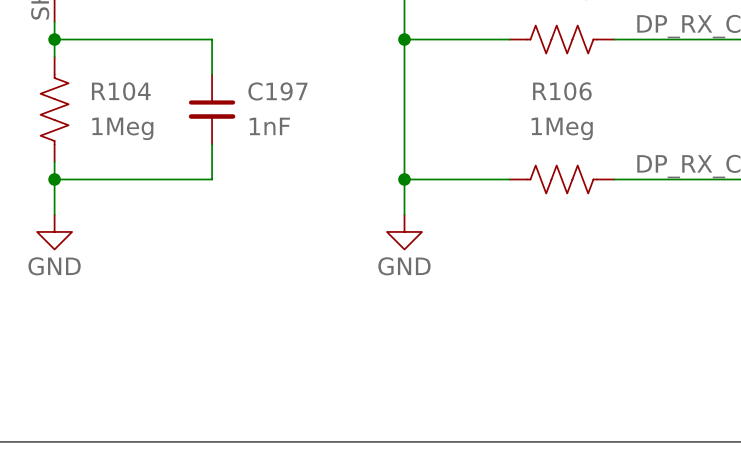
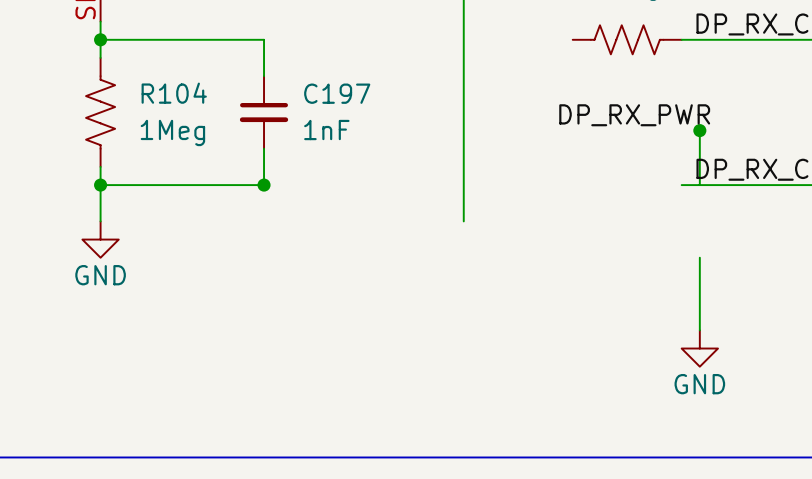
wire: (404, 39) (509, 39) -> none
junction: (404, 39) -> none
label: none -> DP_RX_PWR (634, 115)
wire: none -> (699, 130) (699, 185)
junction: none -> (699, 130)
junction: none -> (264, 185)
wire: (404, 179) (509, 179) -> none
junction: (404, 179) -> none
R106: 1Meg (561, 179) -> none
power symbol: GND (404, 231) -> none
wire: none -> (699, 257) (699, 330)
power symbol: none -> GND (699, 348)

